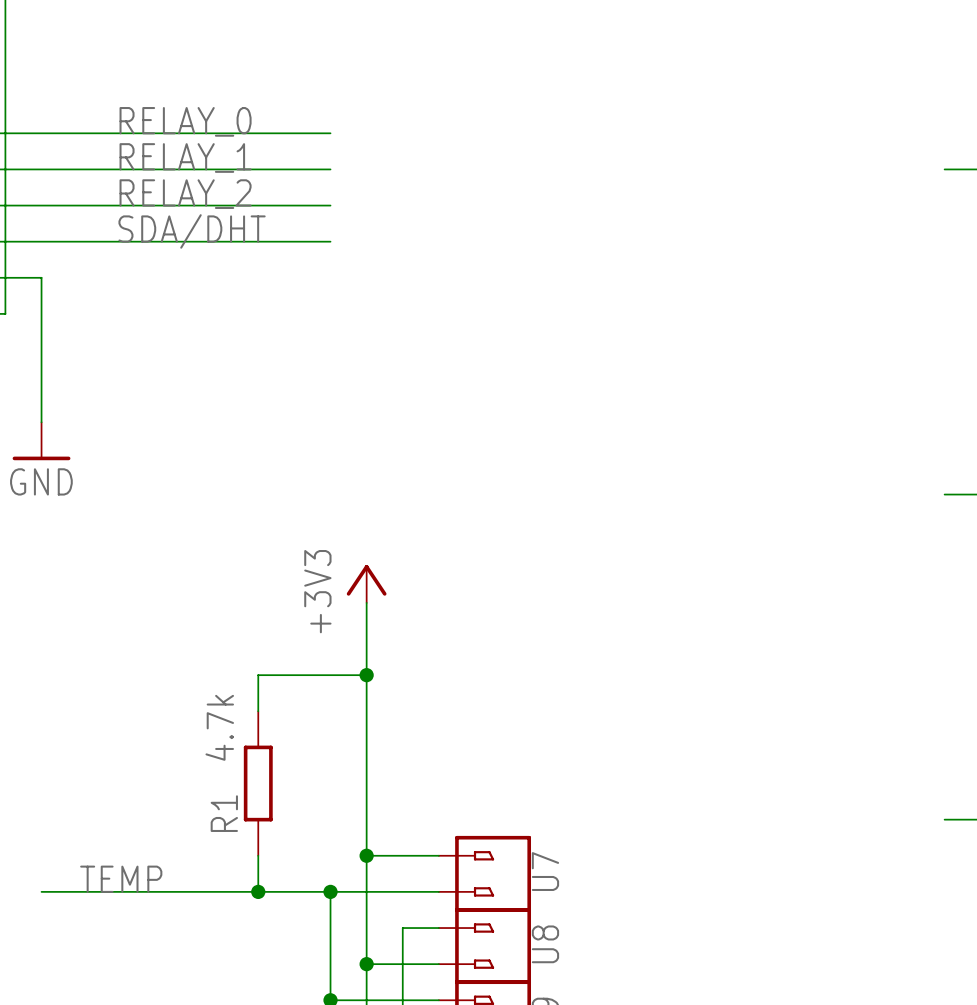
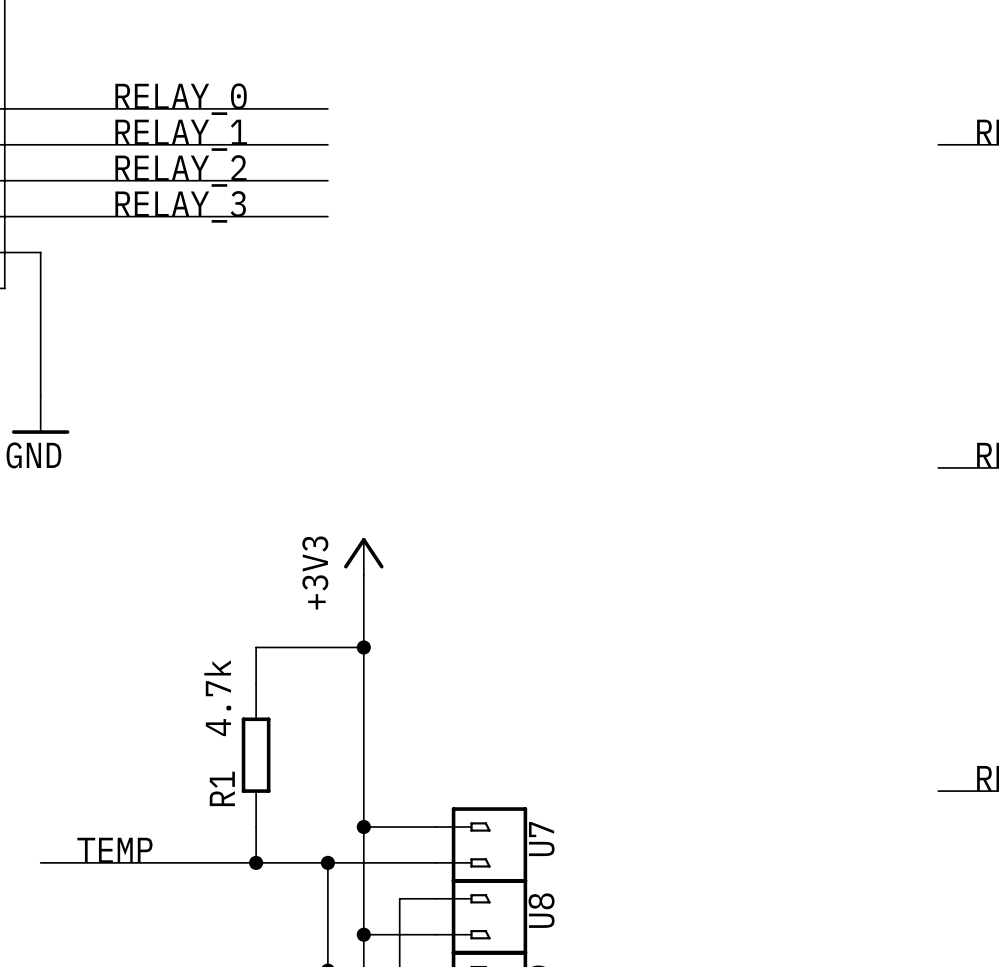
label: SDA/DHT (192, 231) -> RELAY_3 (180, 206)

